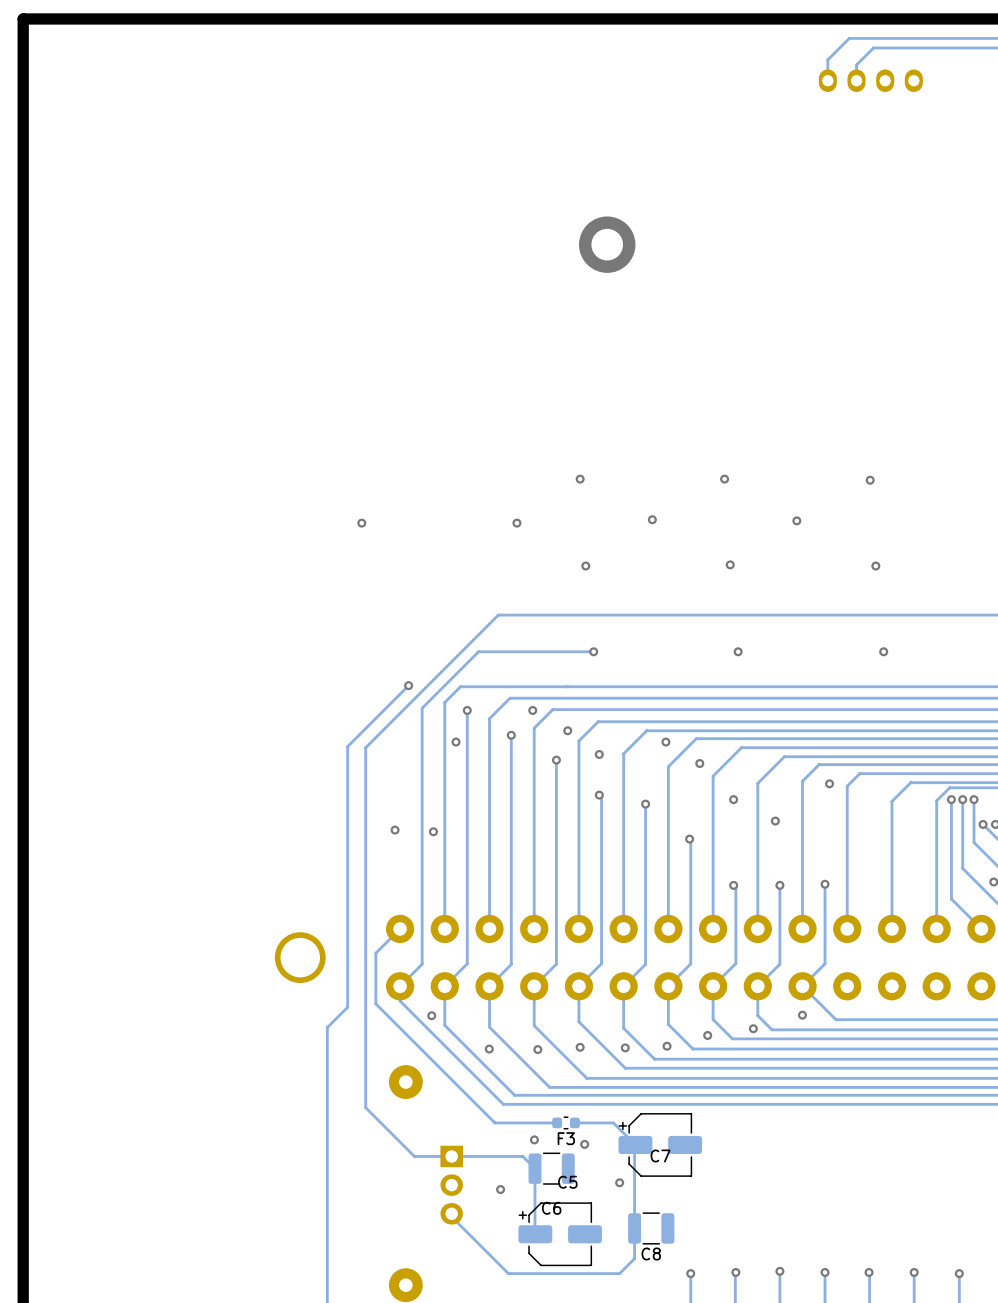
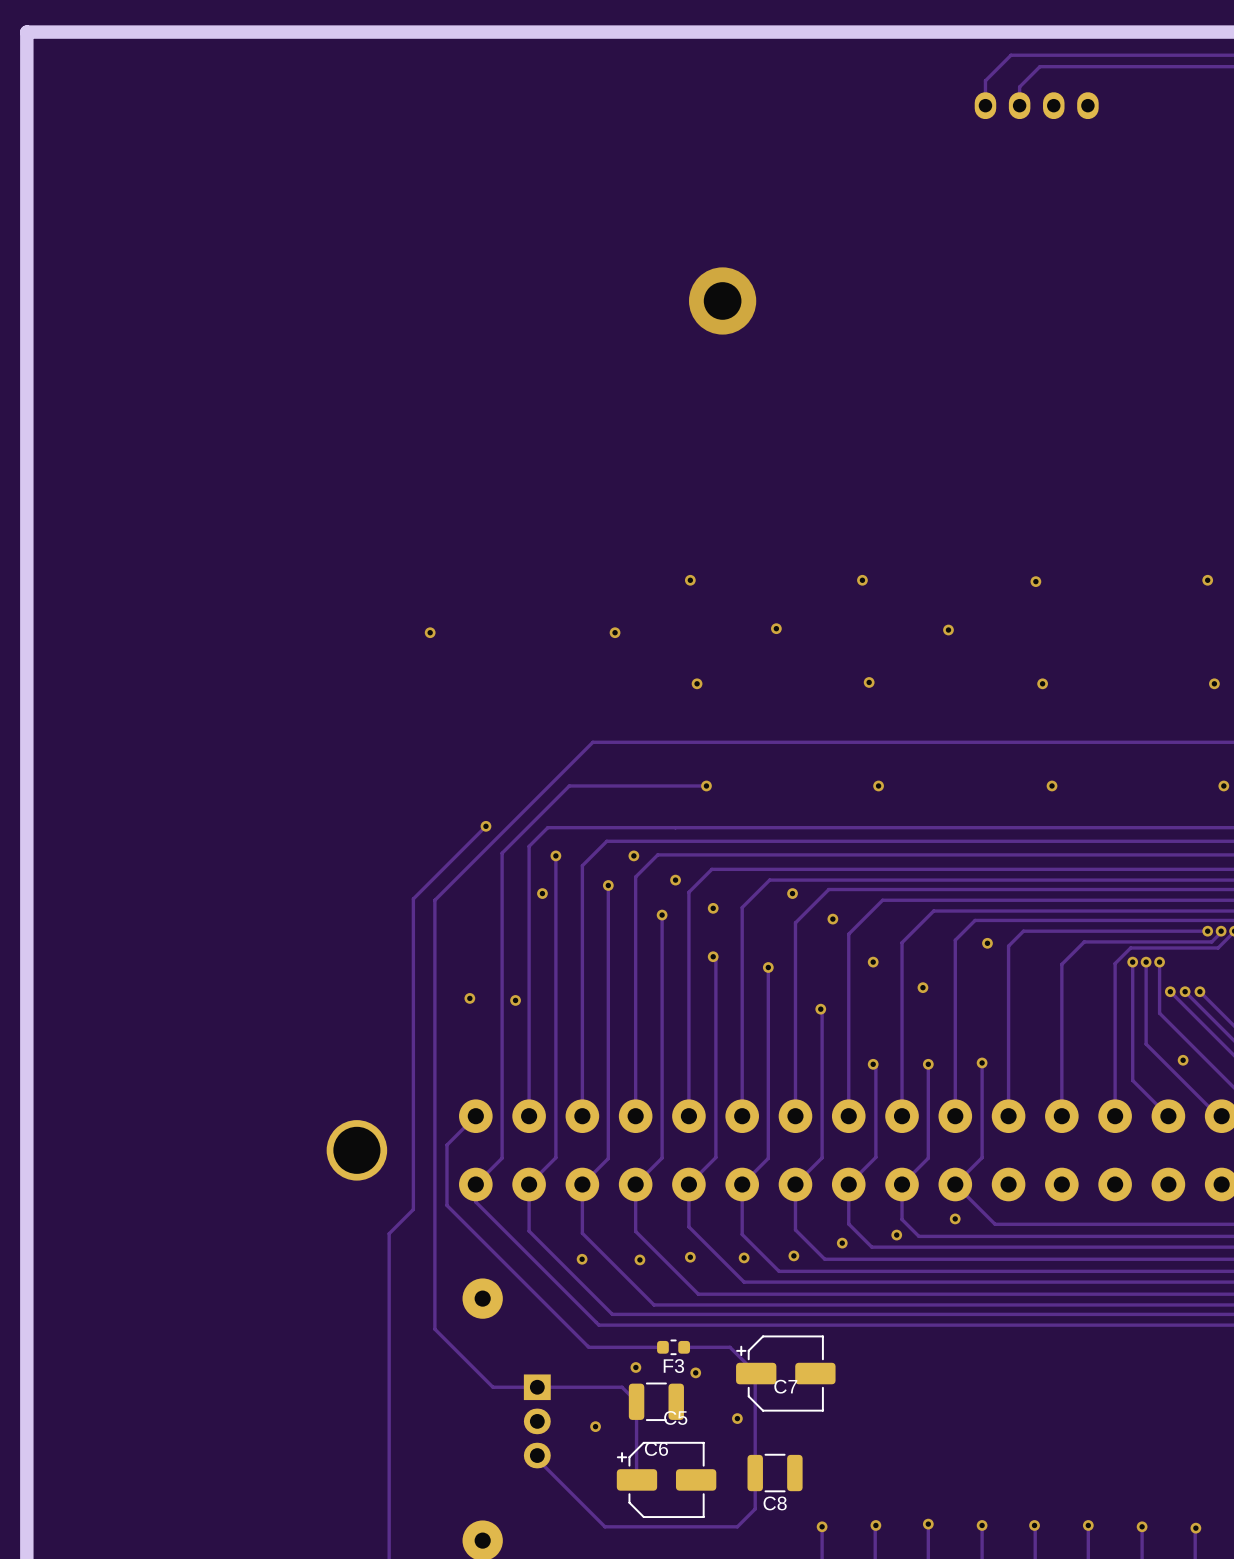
via: (431, 1015) -> none

